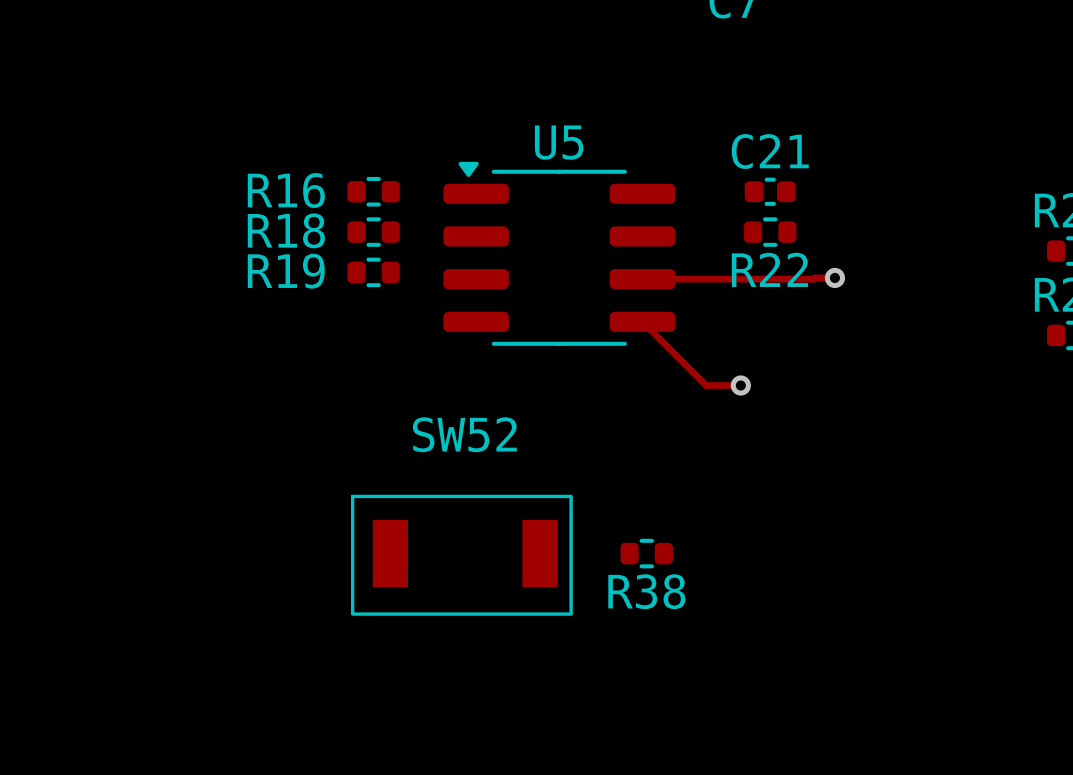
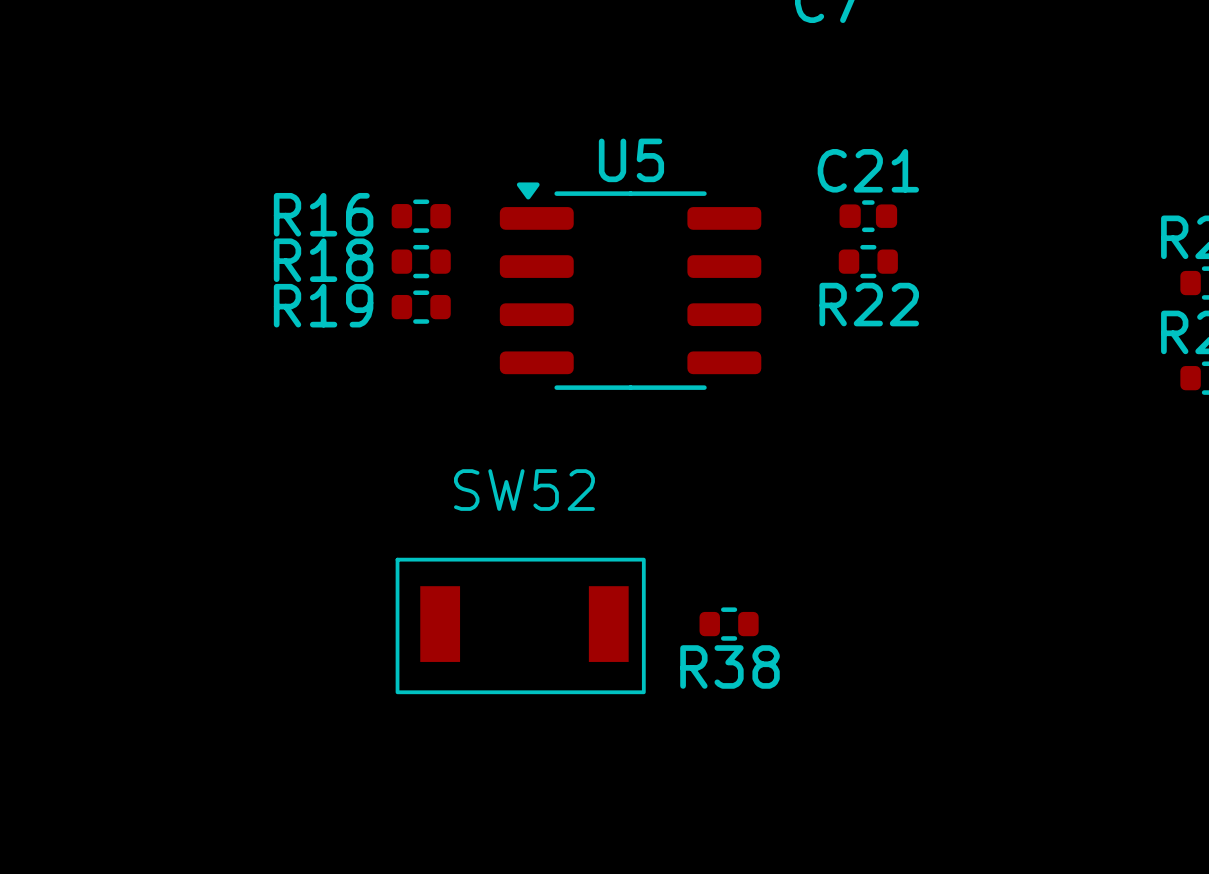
track: (834, 277) (642, 279) -> none
via: (834, 277) -> none
track: (642, 321) (706, 385) (740, 385) -> none
via: (740, 385) -> none

